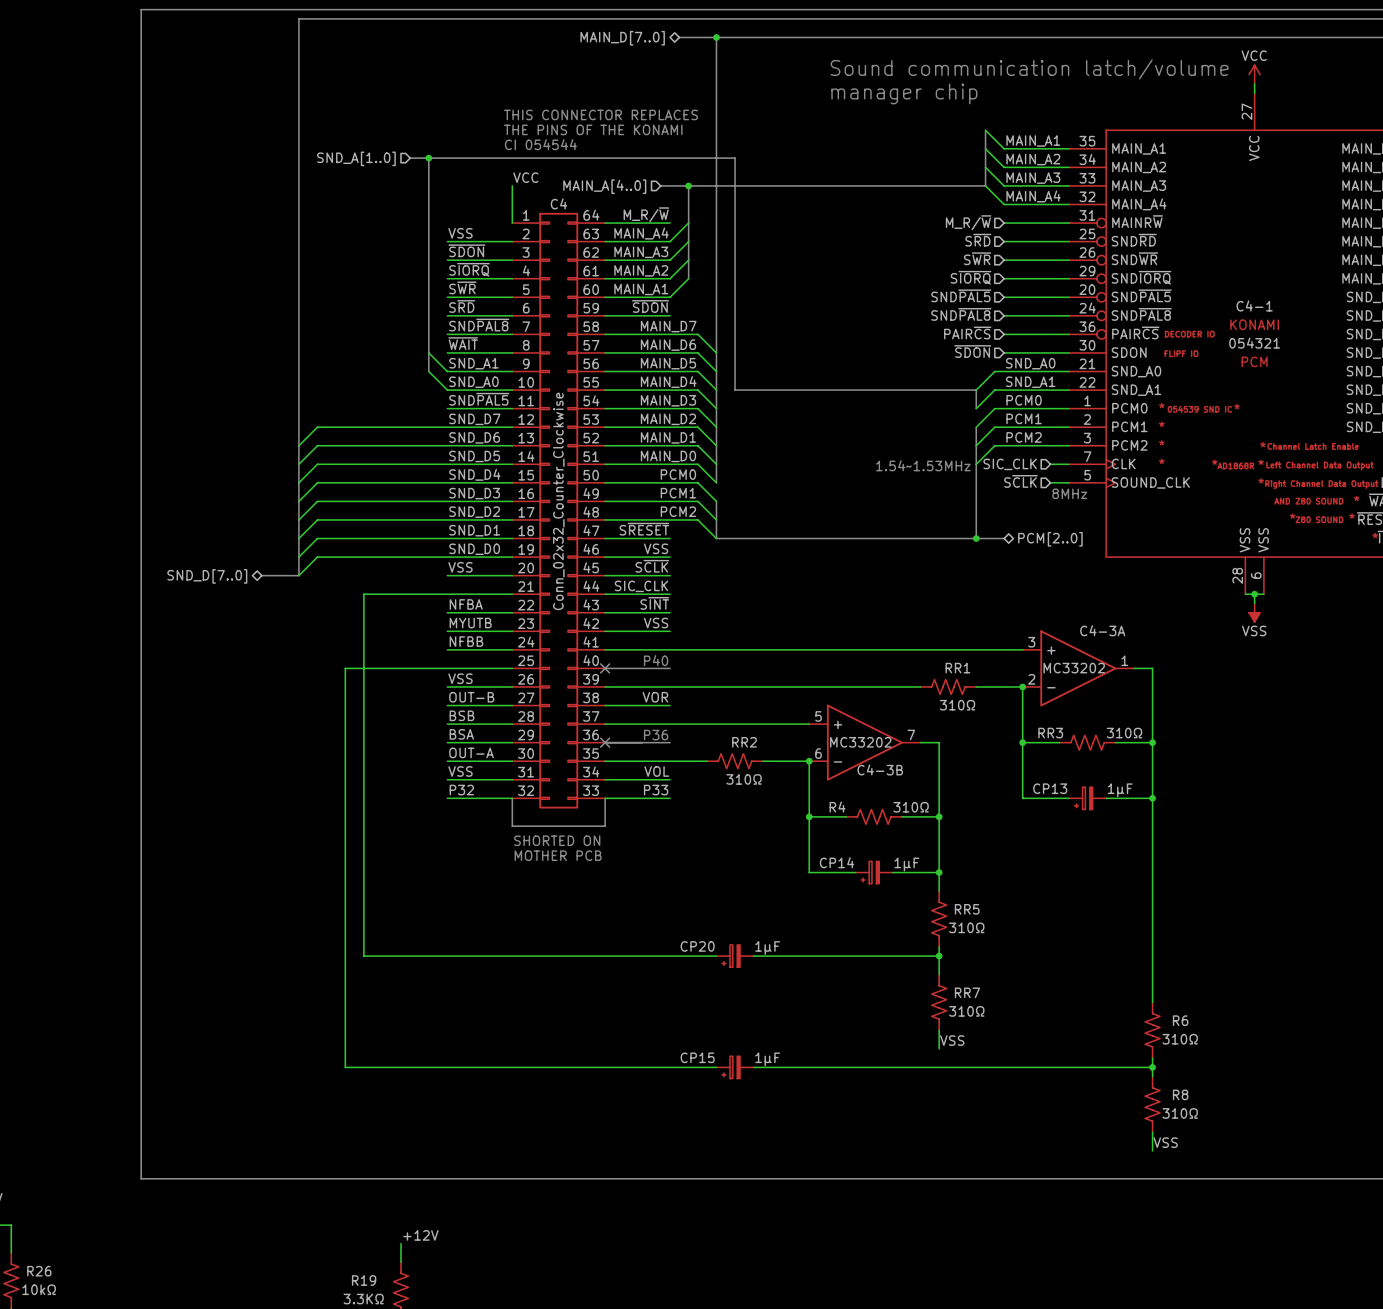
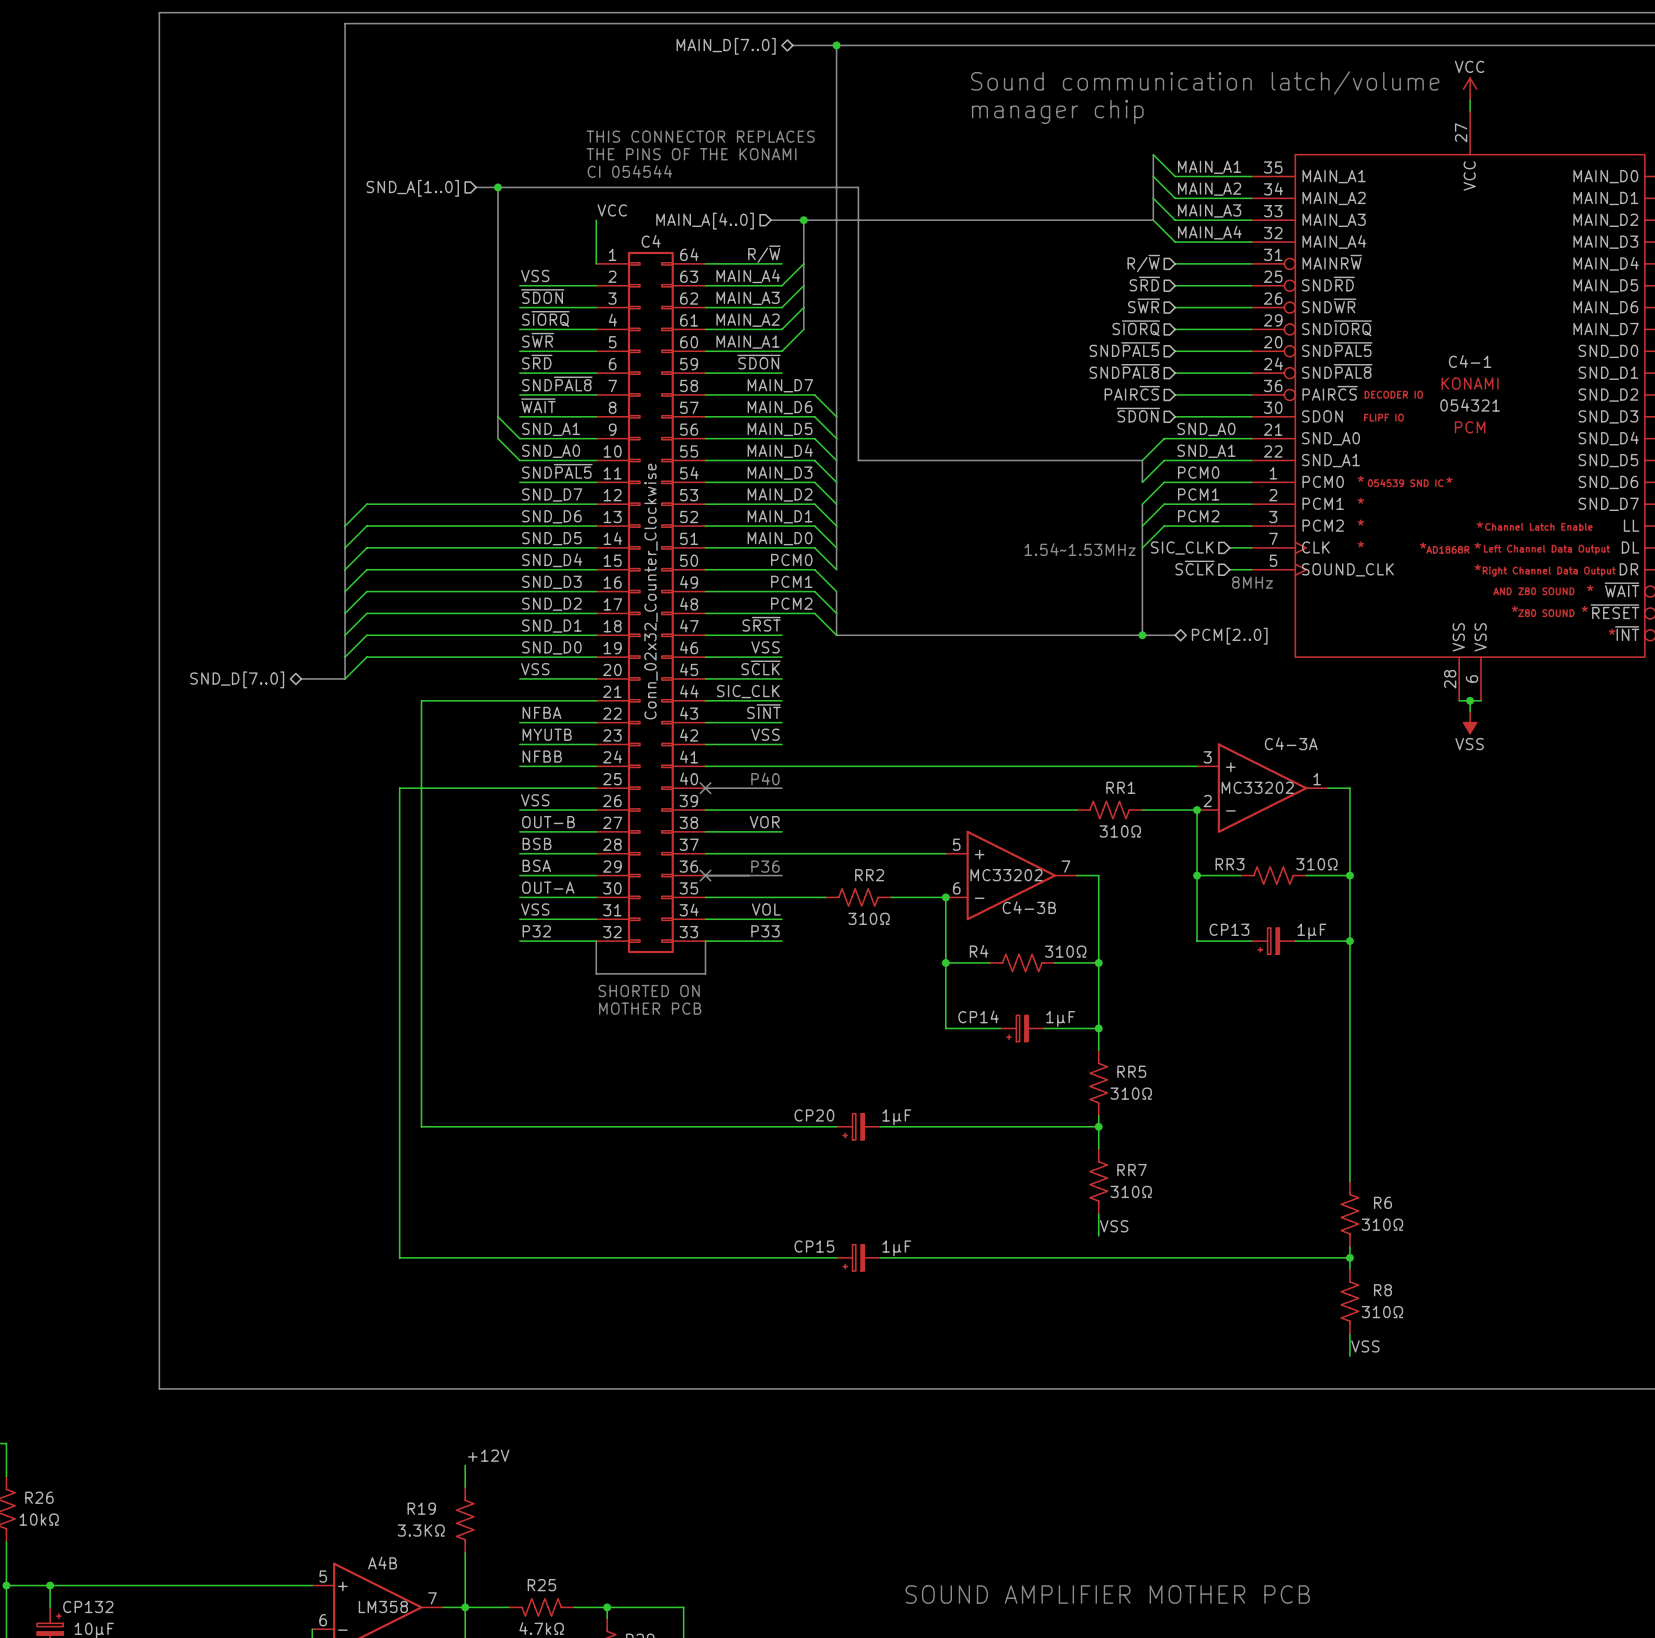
label: M_R/~{W} (646, 214) -> R/~{W} (764, 254)
hierarchical label: M_R/~{W} (968, 222) -> R/~{W} (1143, 263)
label: S~{RESET} (644, 529) -> S~{RST} (761, 624)

